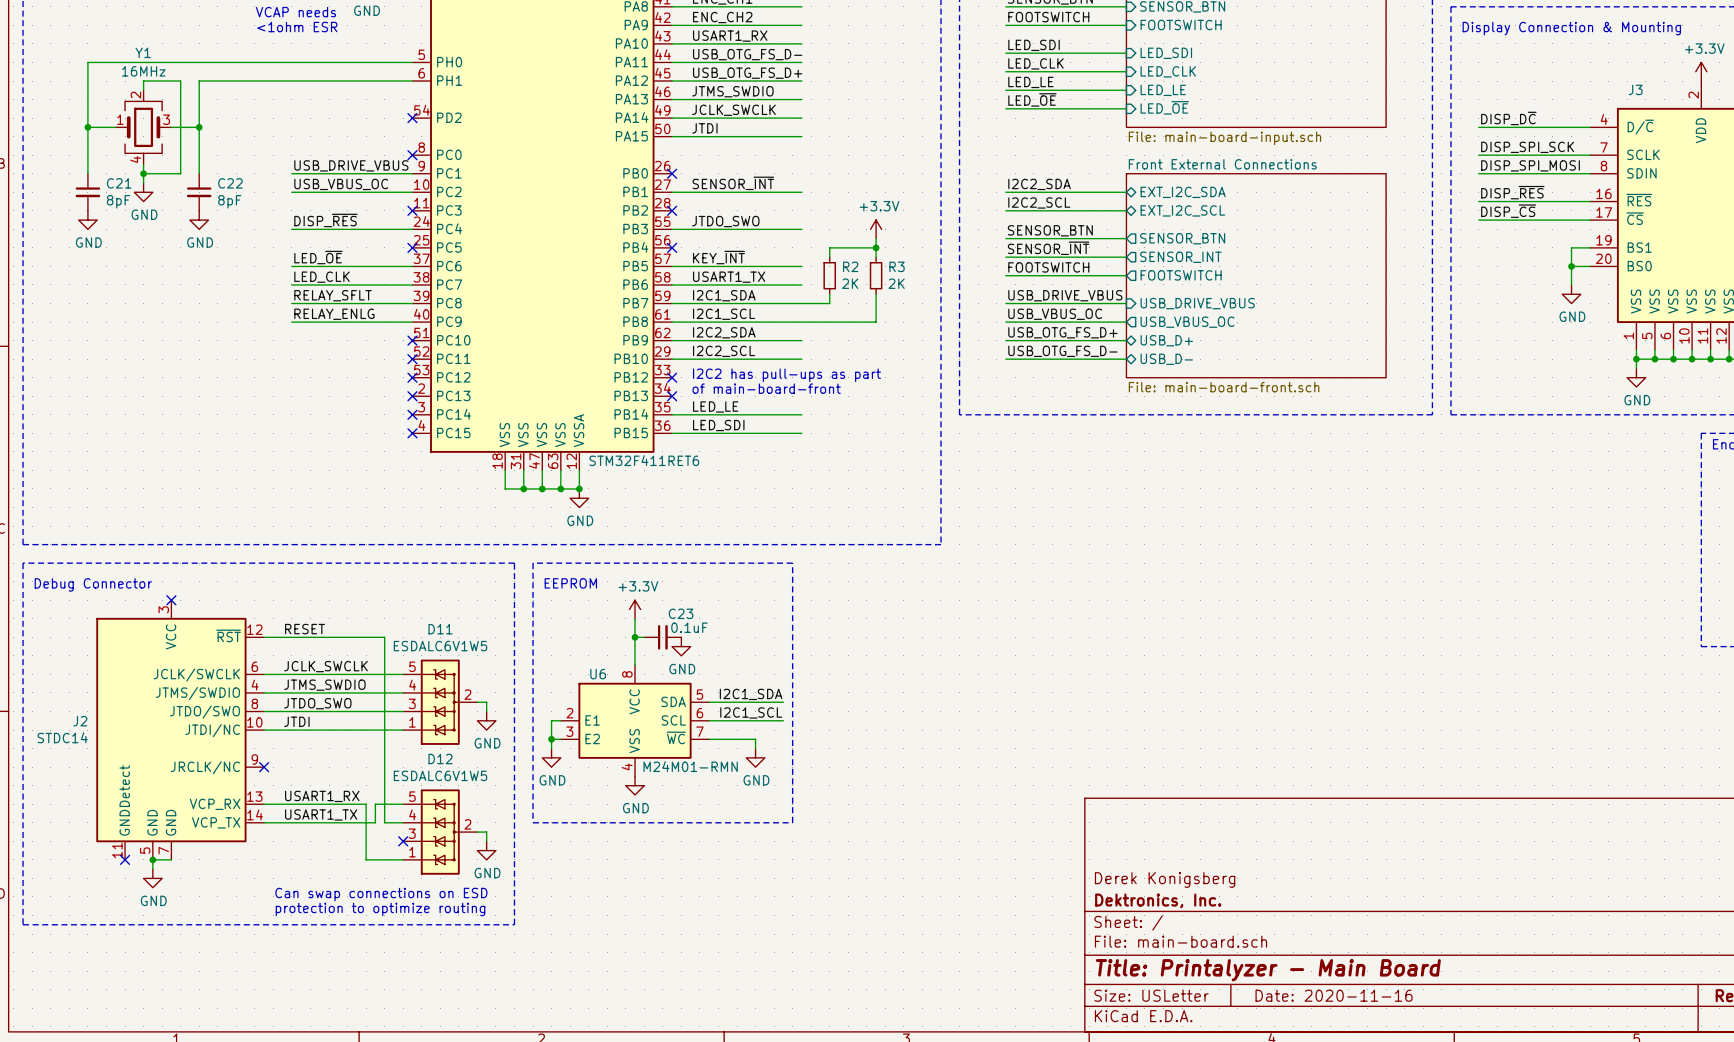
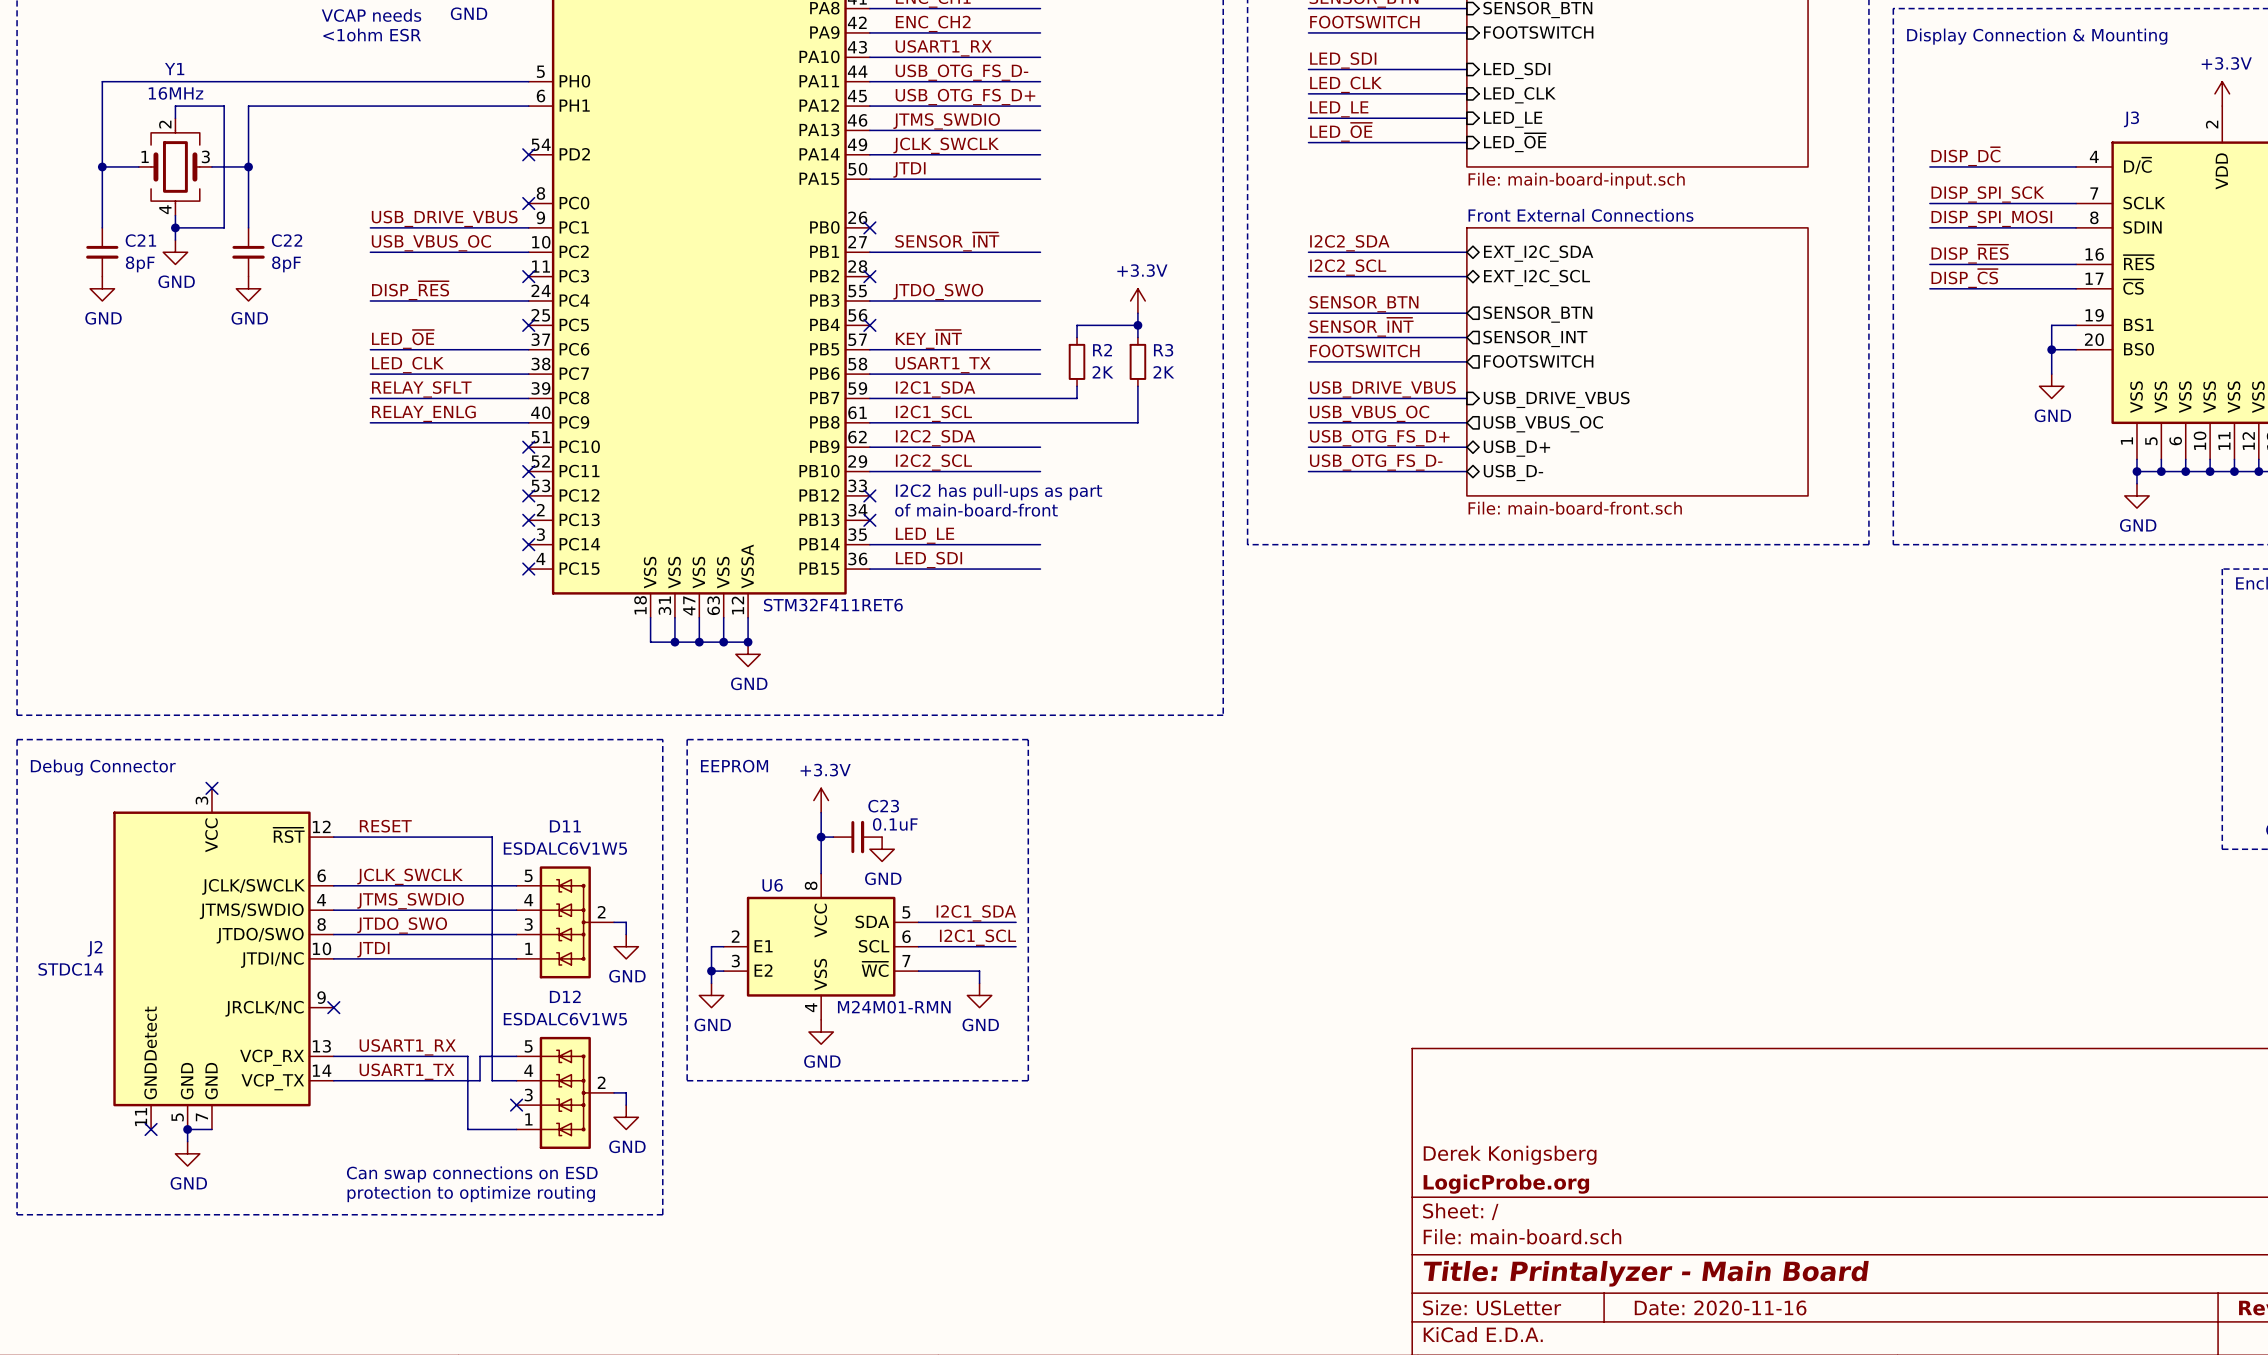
title block: Dektronics, Inc. (1158, 900) -> LogicProbe.org (1506, 1184)

